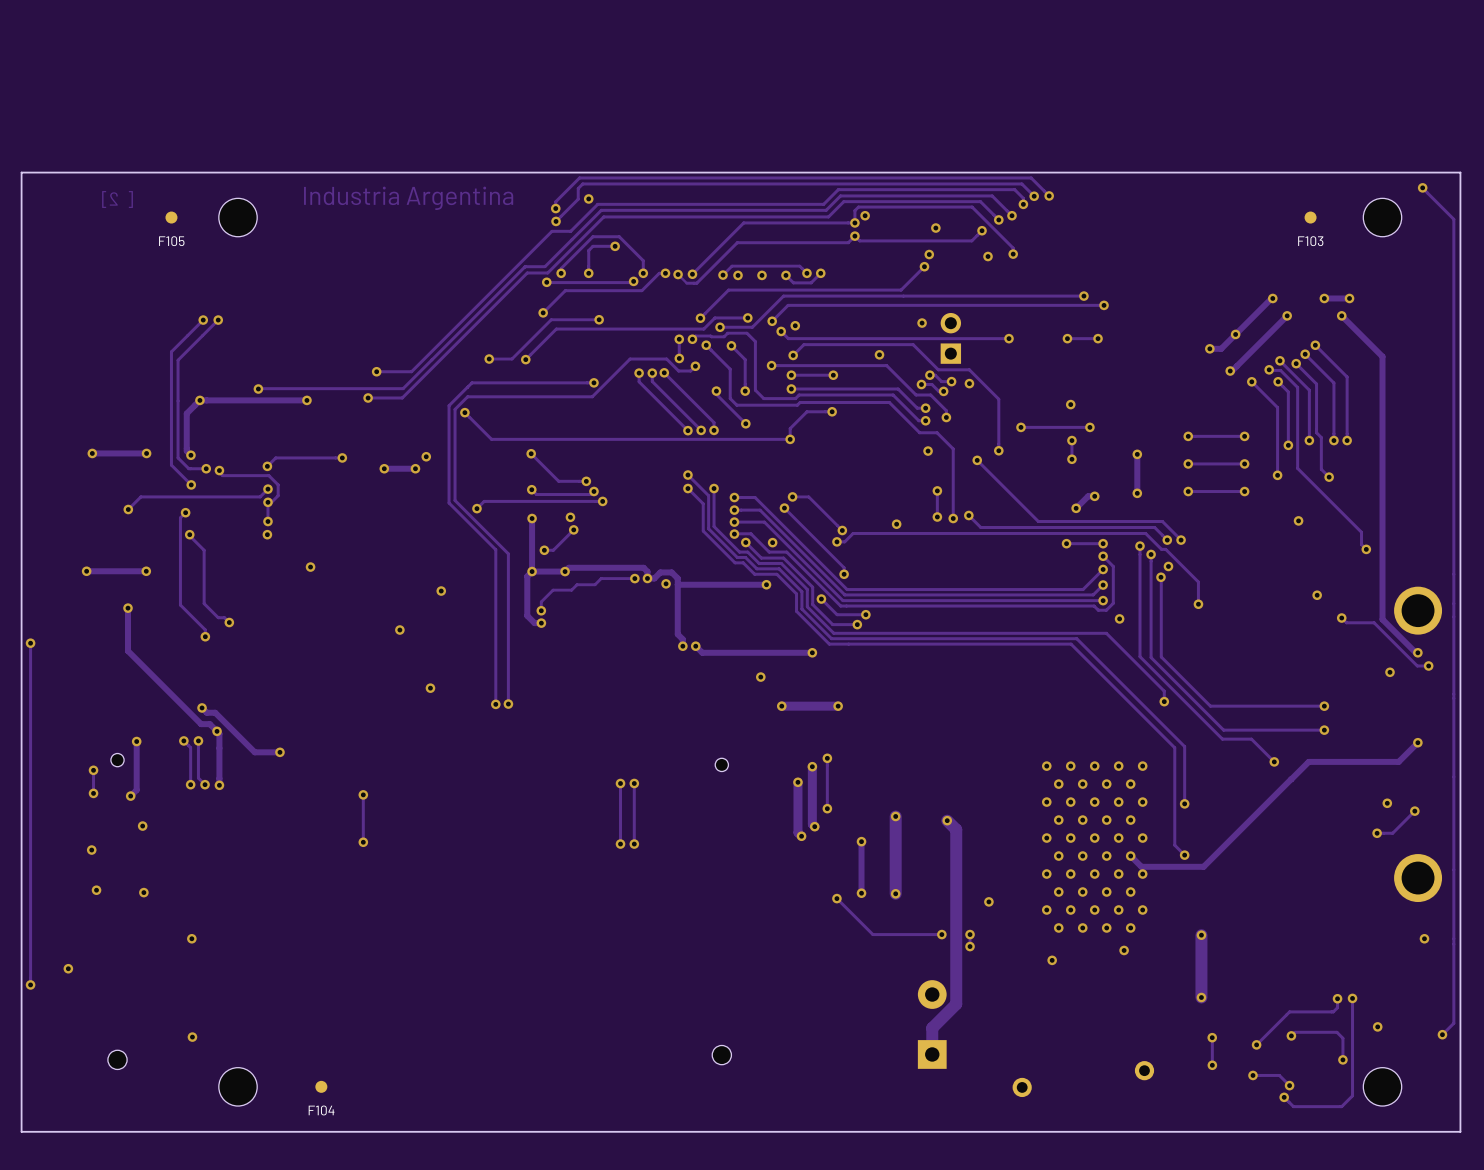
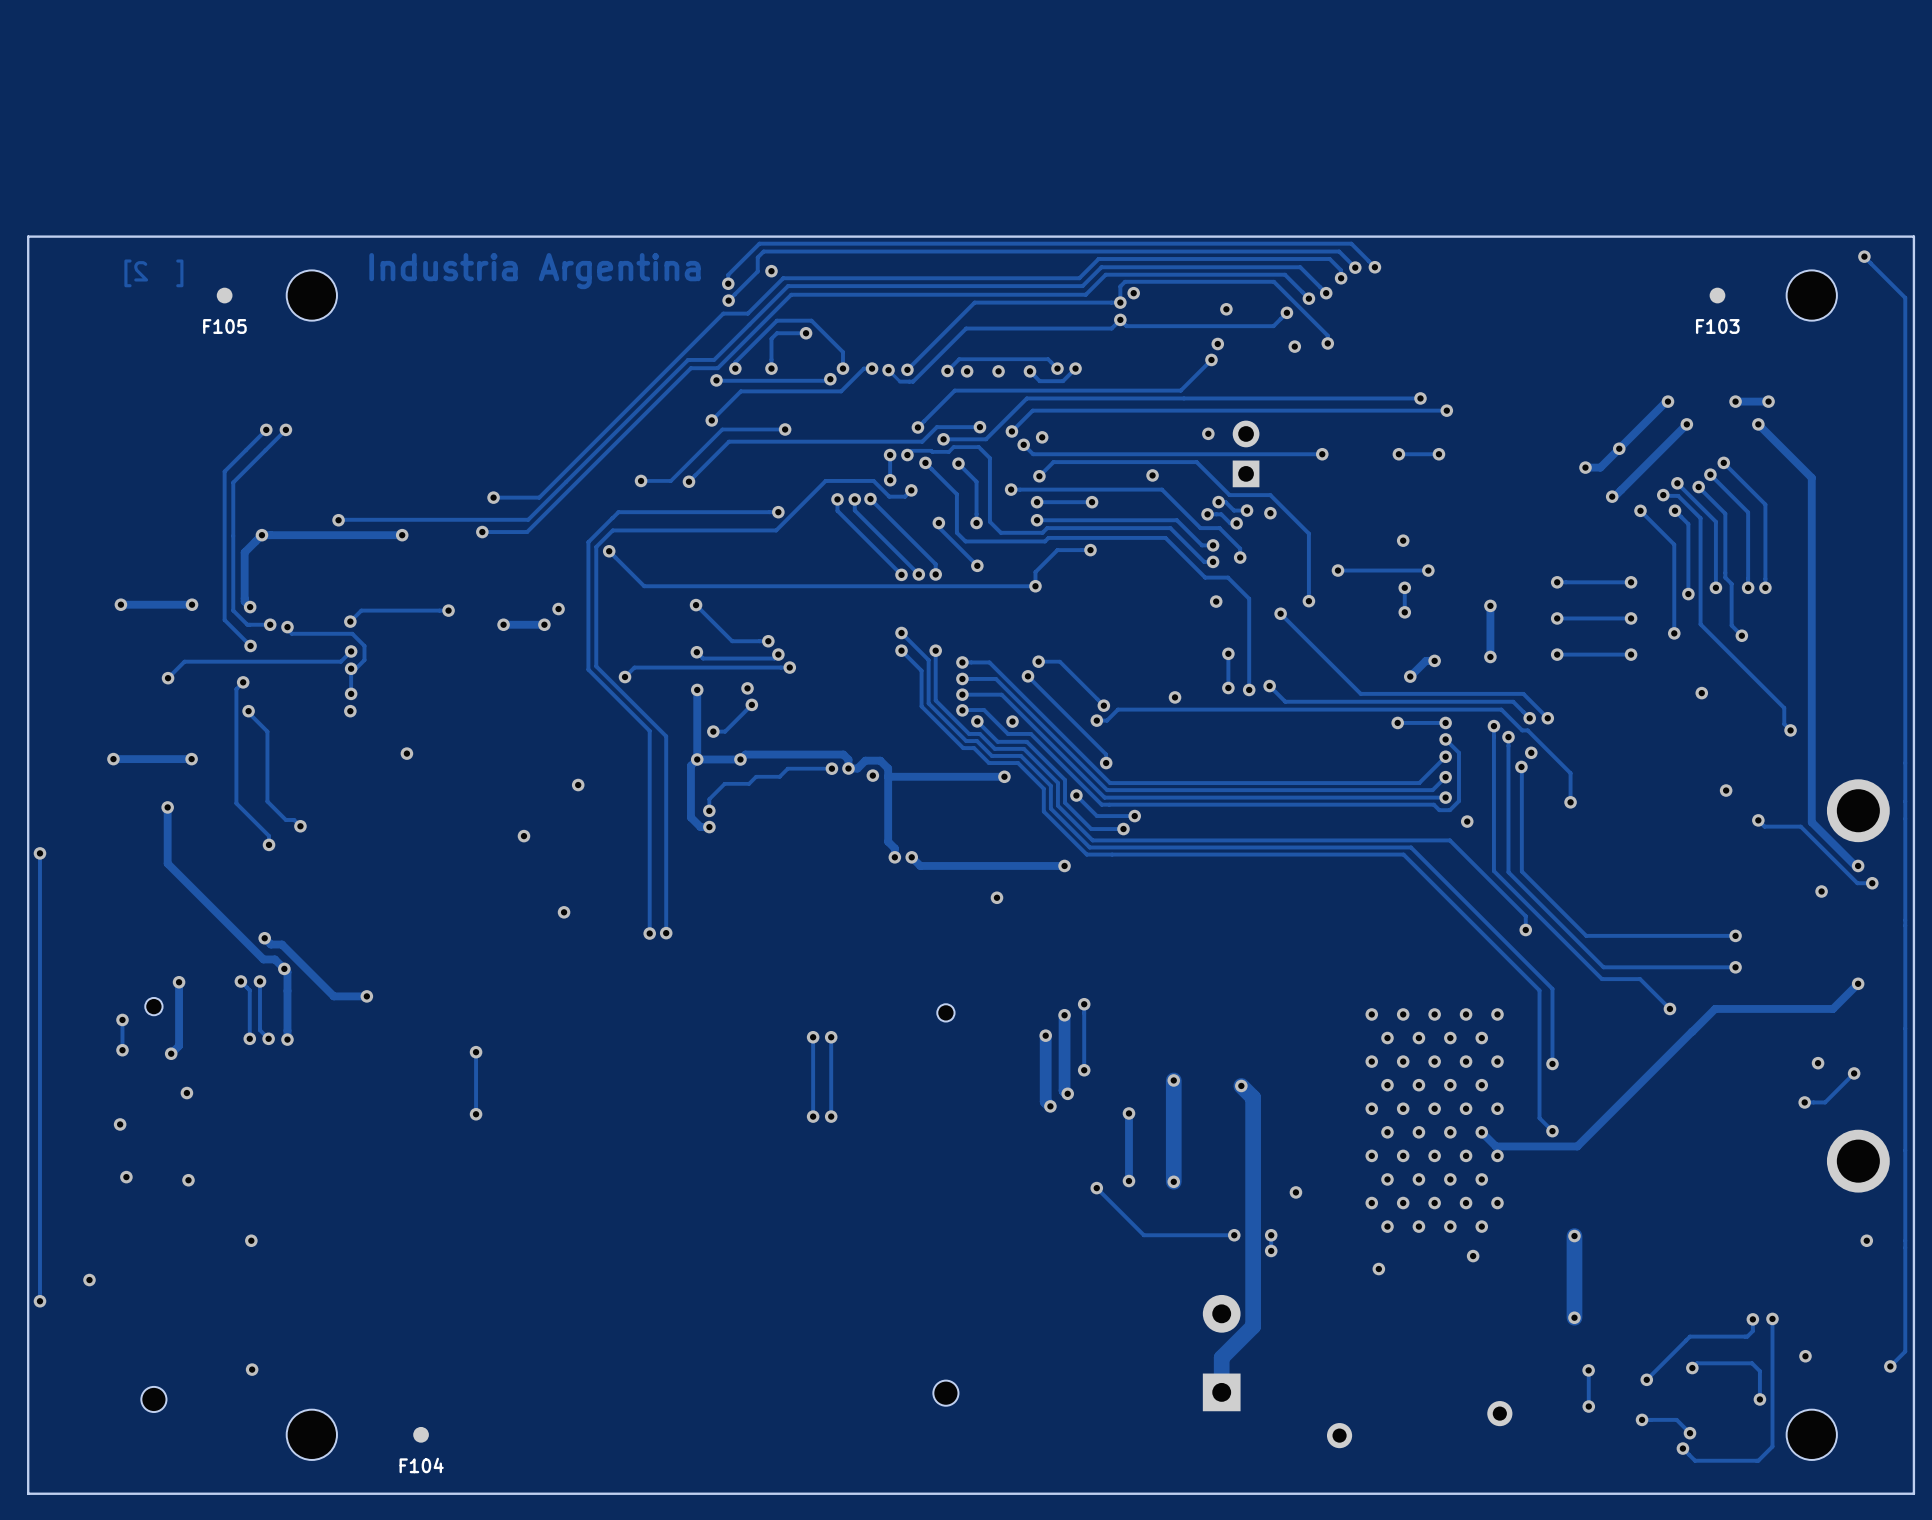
via: (781, 706) -> none
track: (838, 706) (781, 706) -> none
via: (838, 706) -> none

